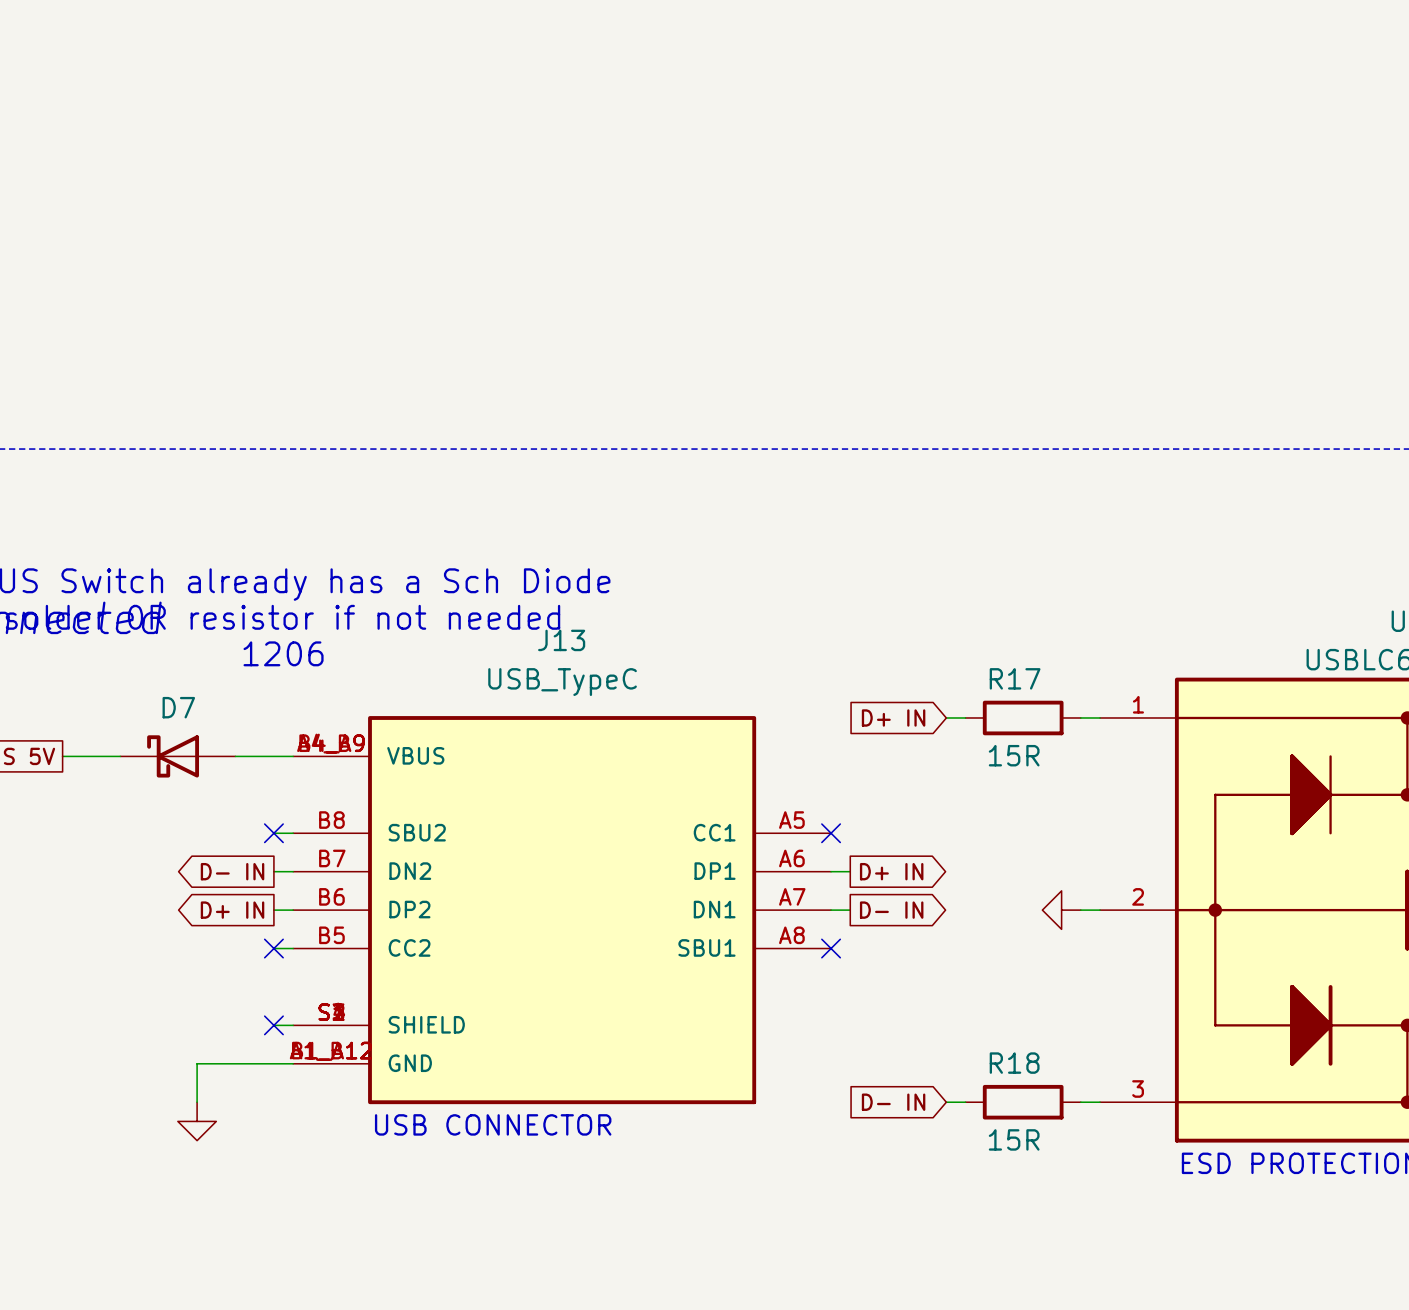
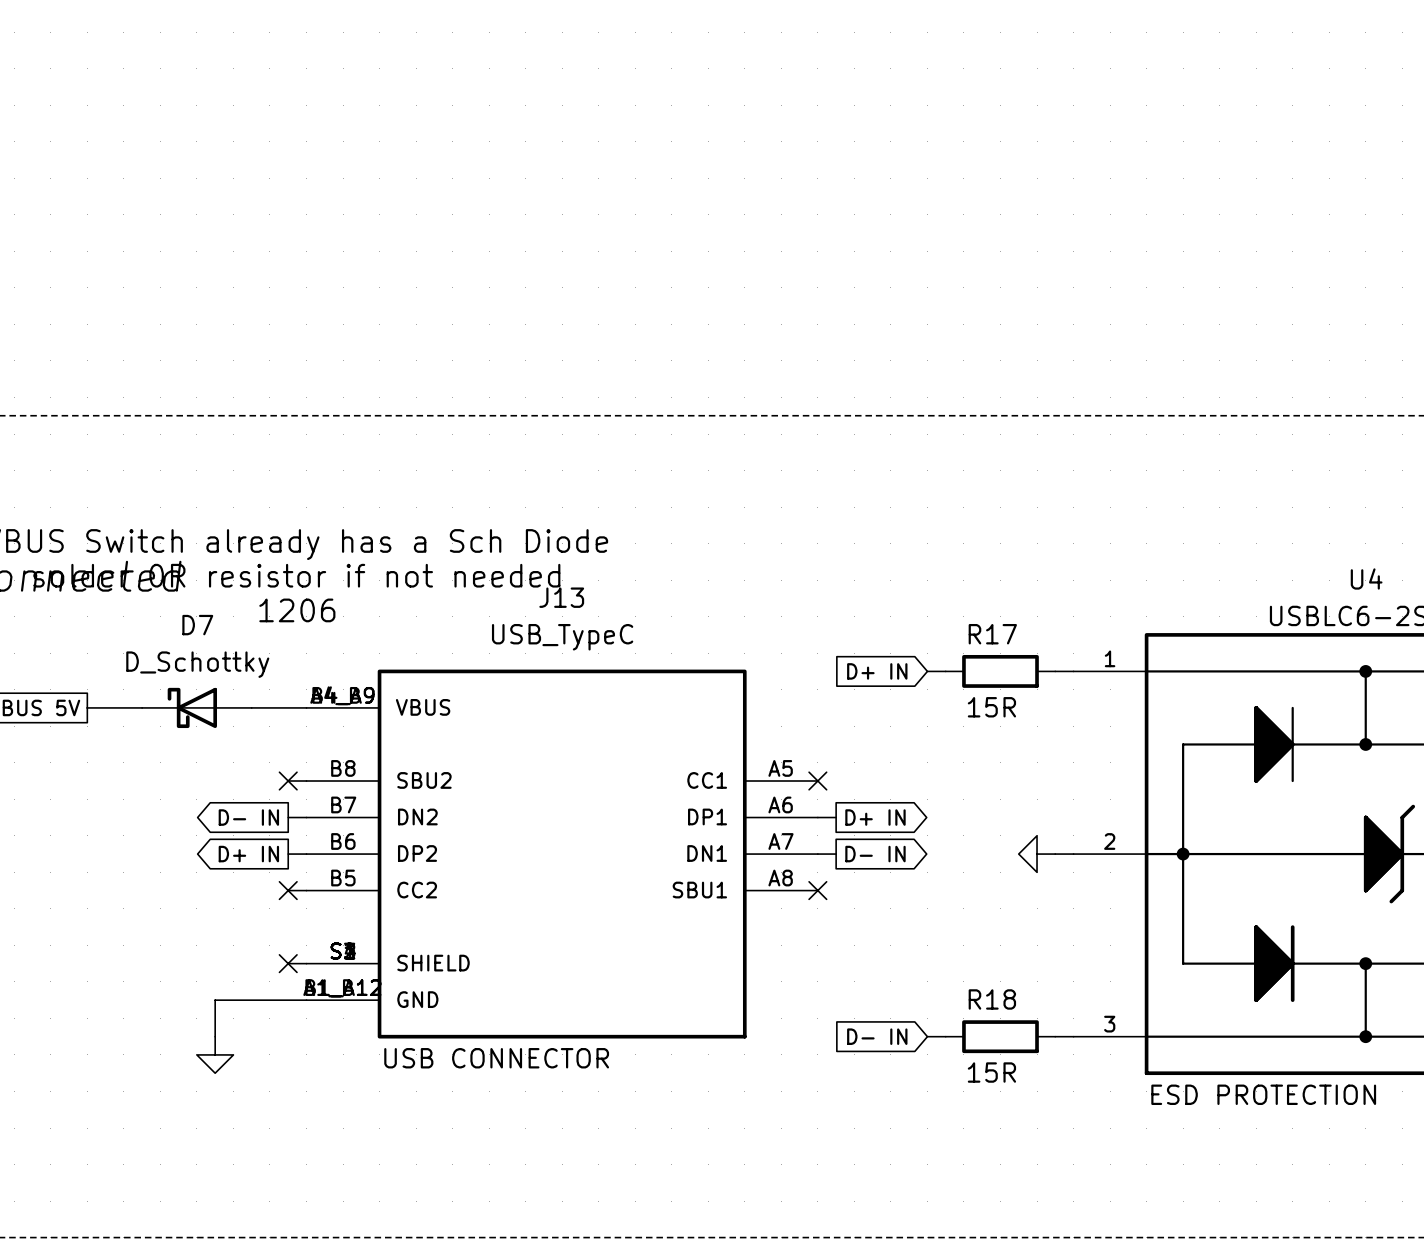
D7 name position: D7 (178, 707) -> D7 (197, 625)
D7 value: none -> D_Schottky (197, 664)

